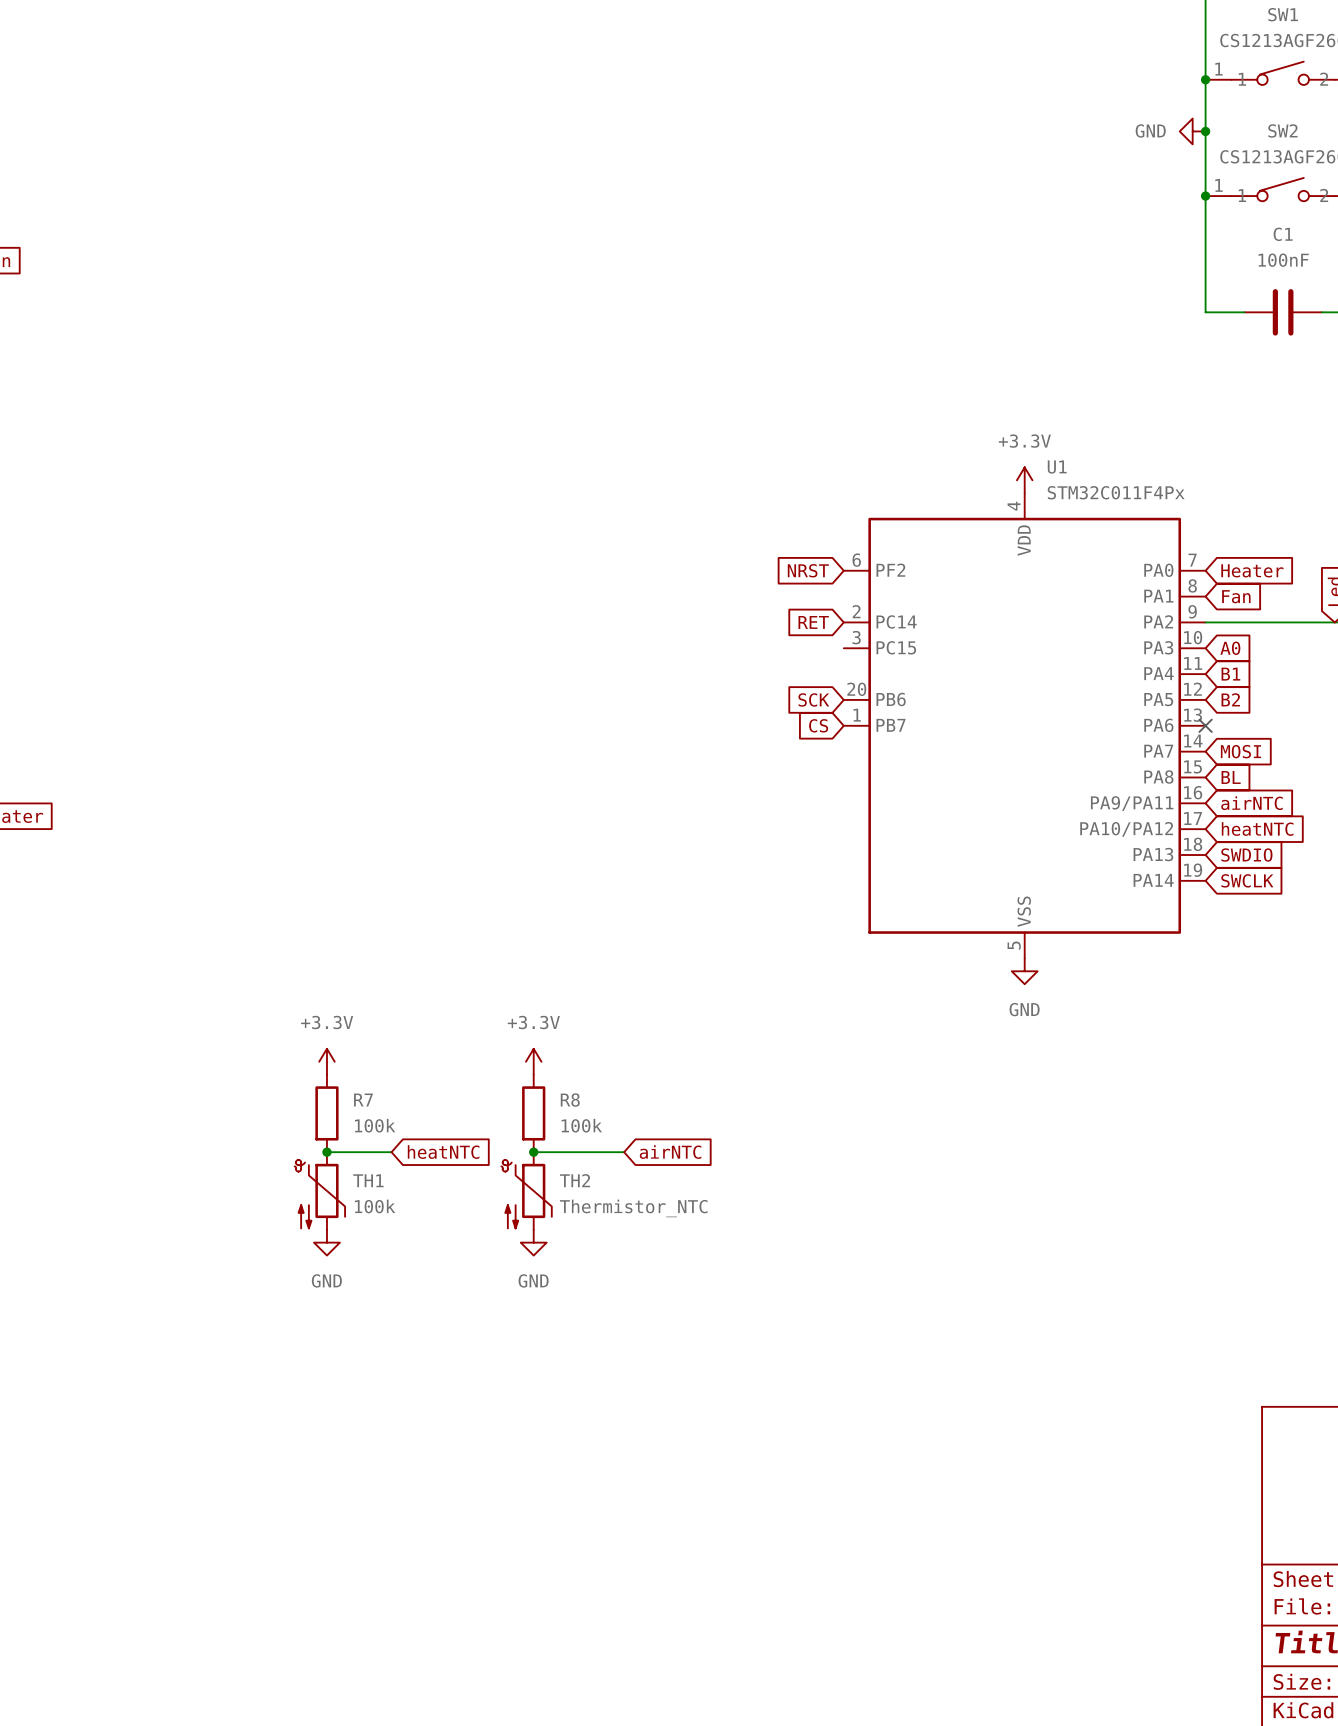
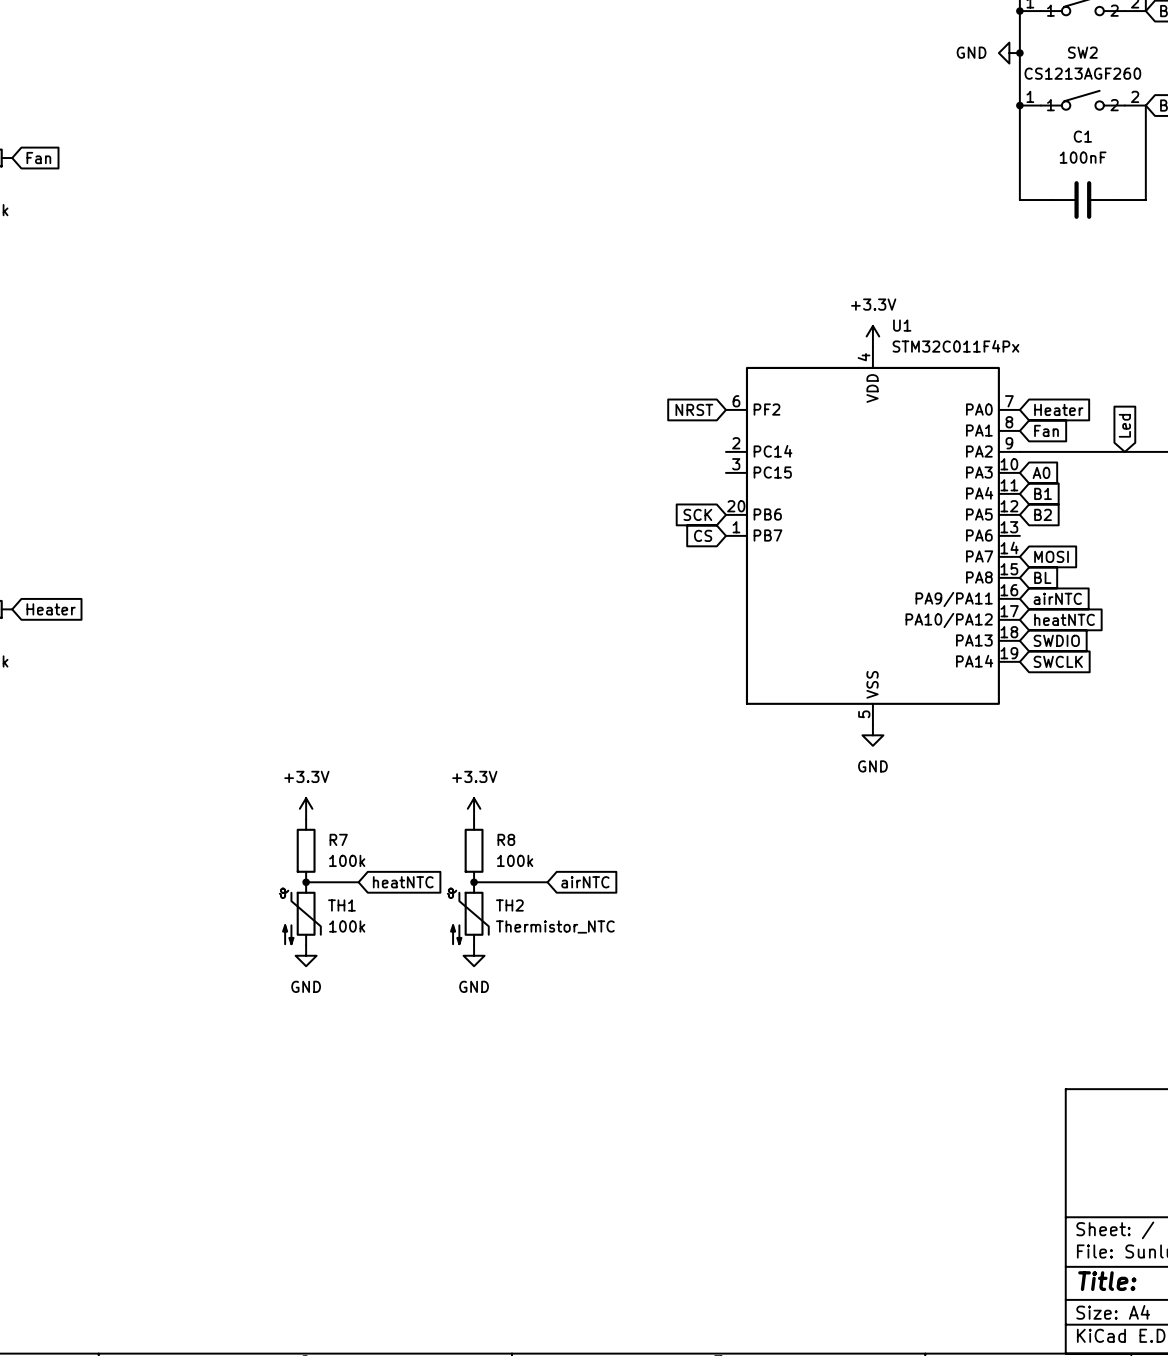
global label: RET (813, 622) -> none
no-connect mark: (1205, 725) -> none

